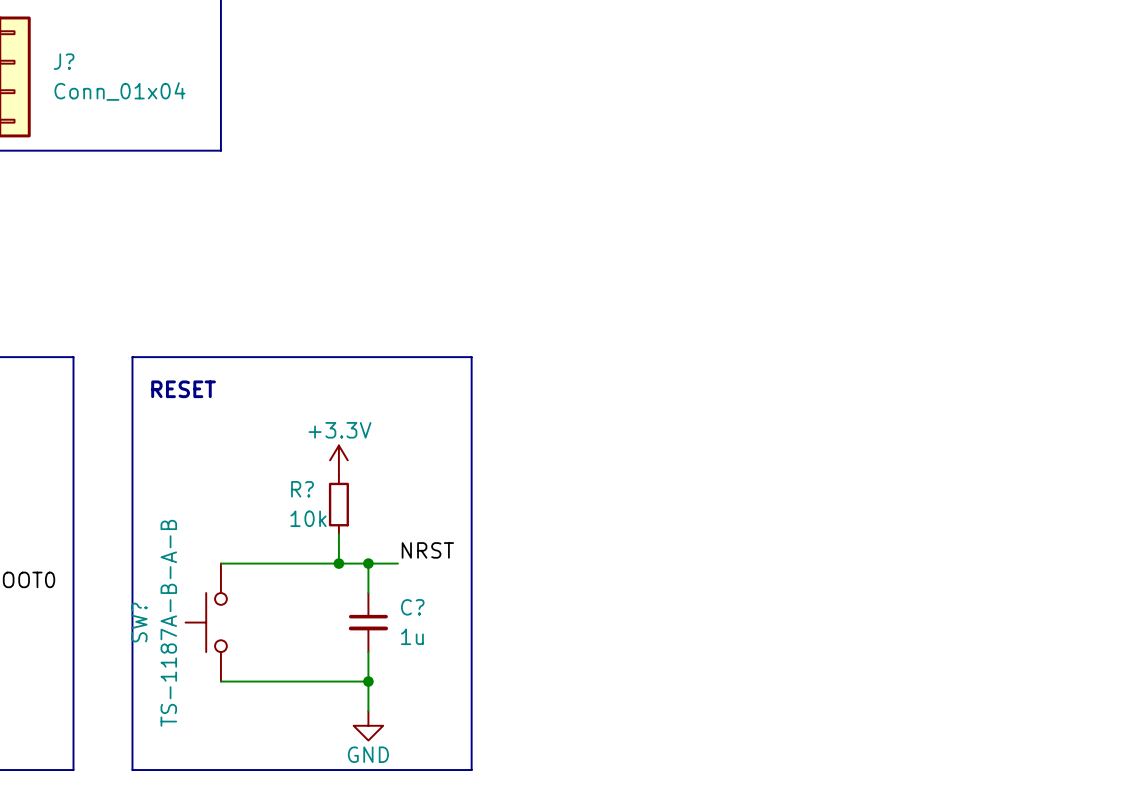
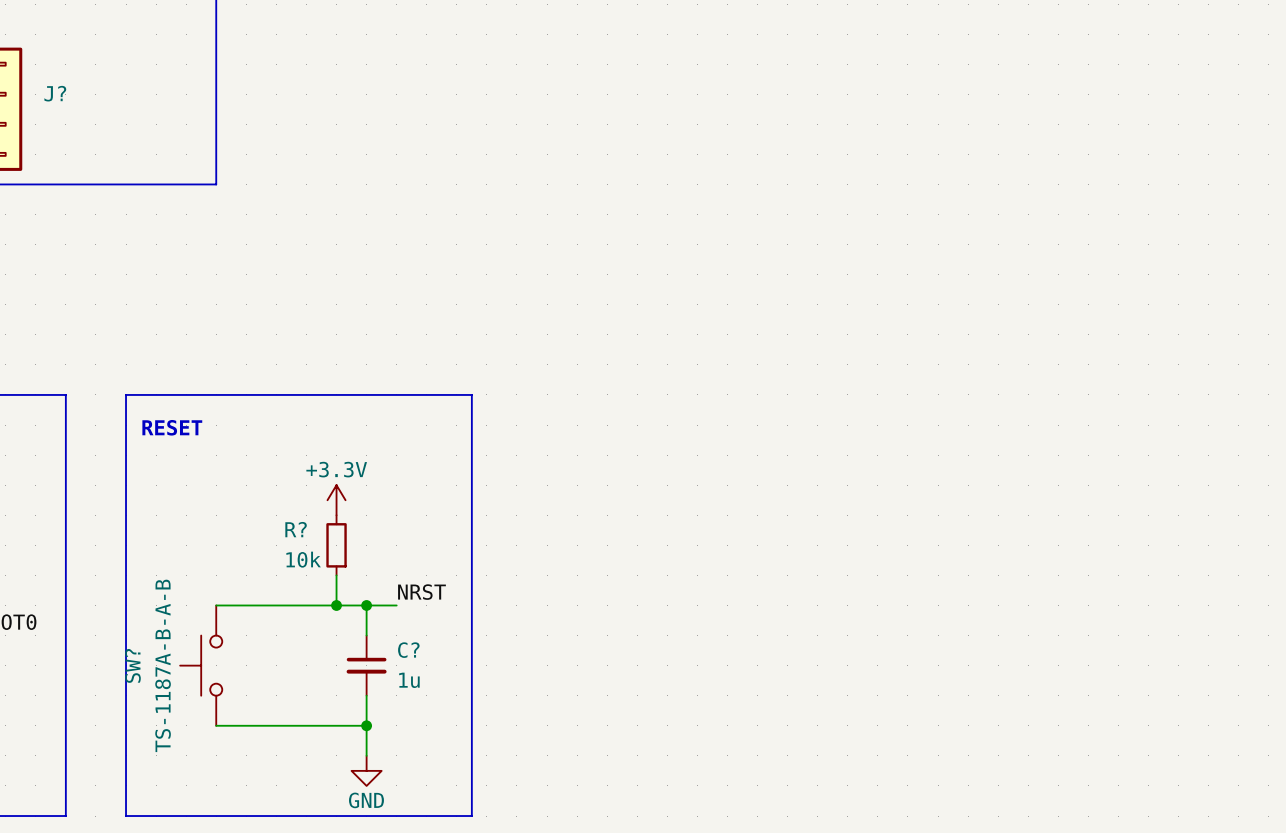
J? value: Conn_01x04 (119, 91) -> none

